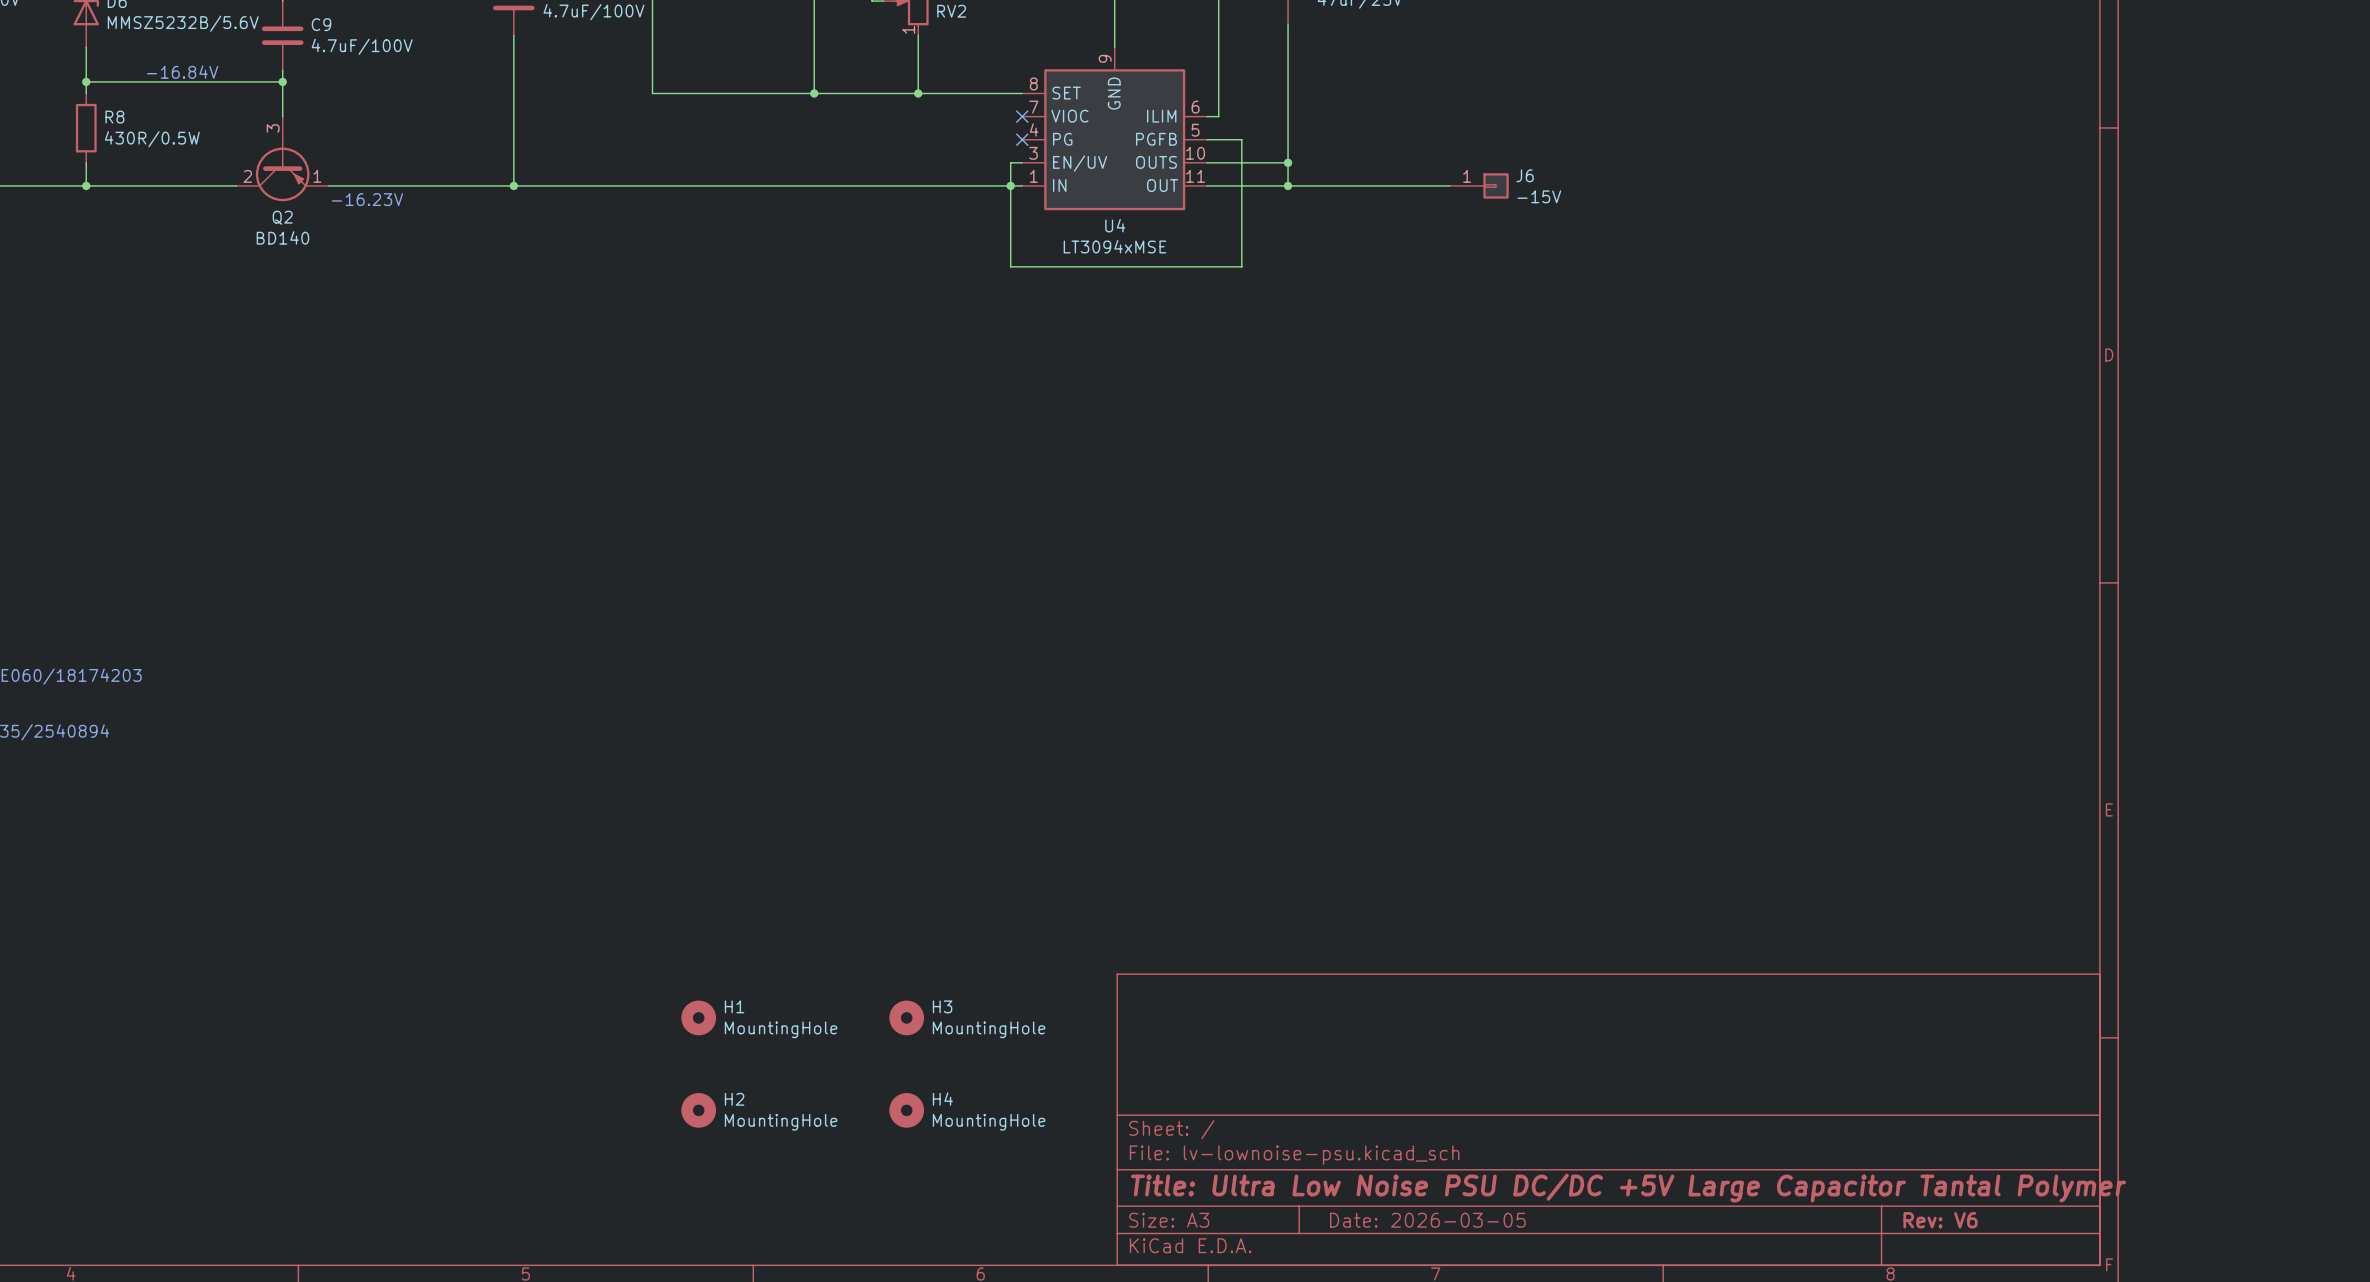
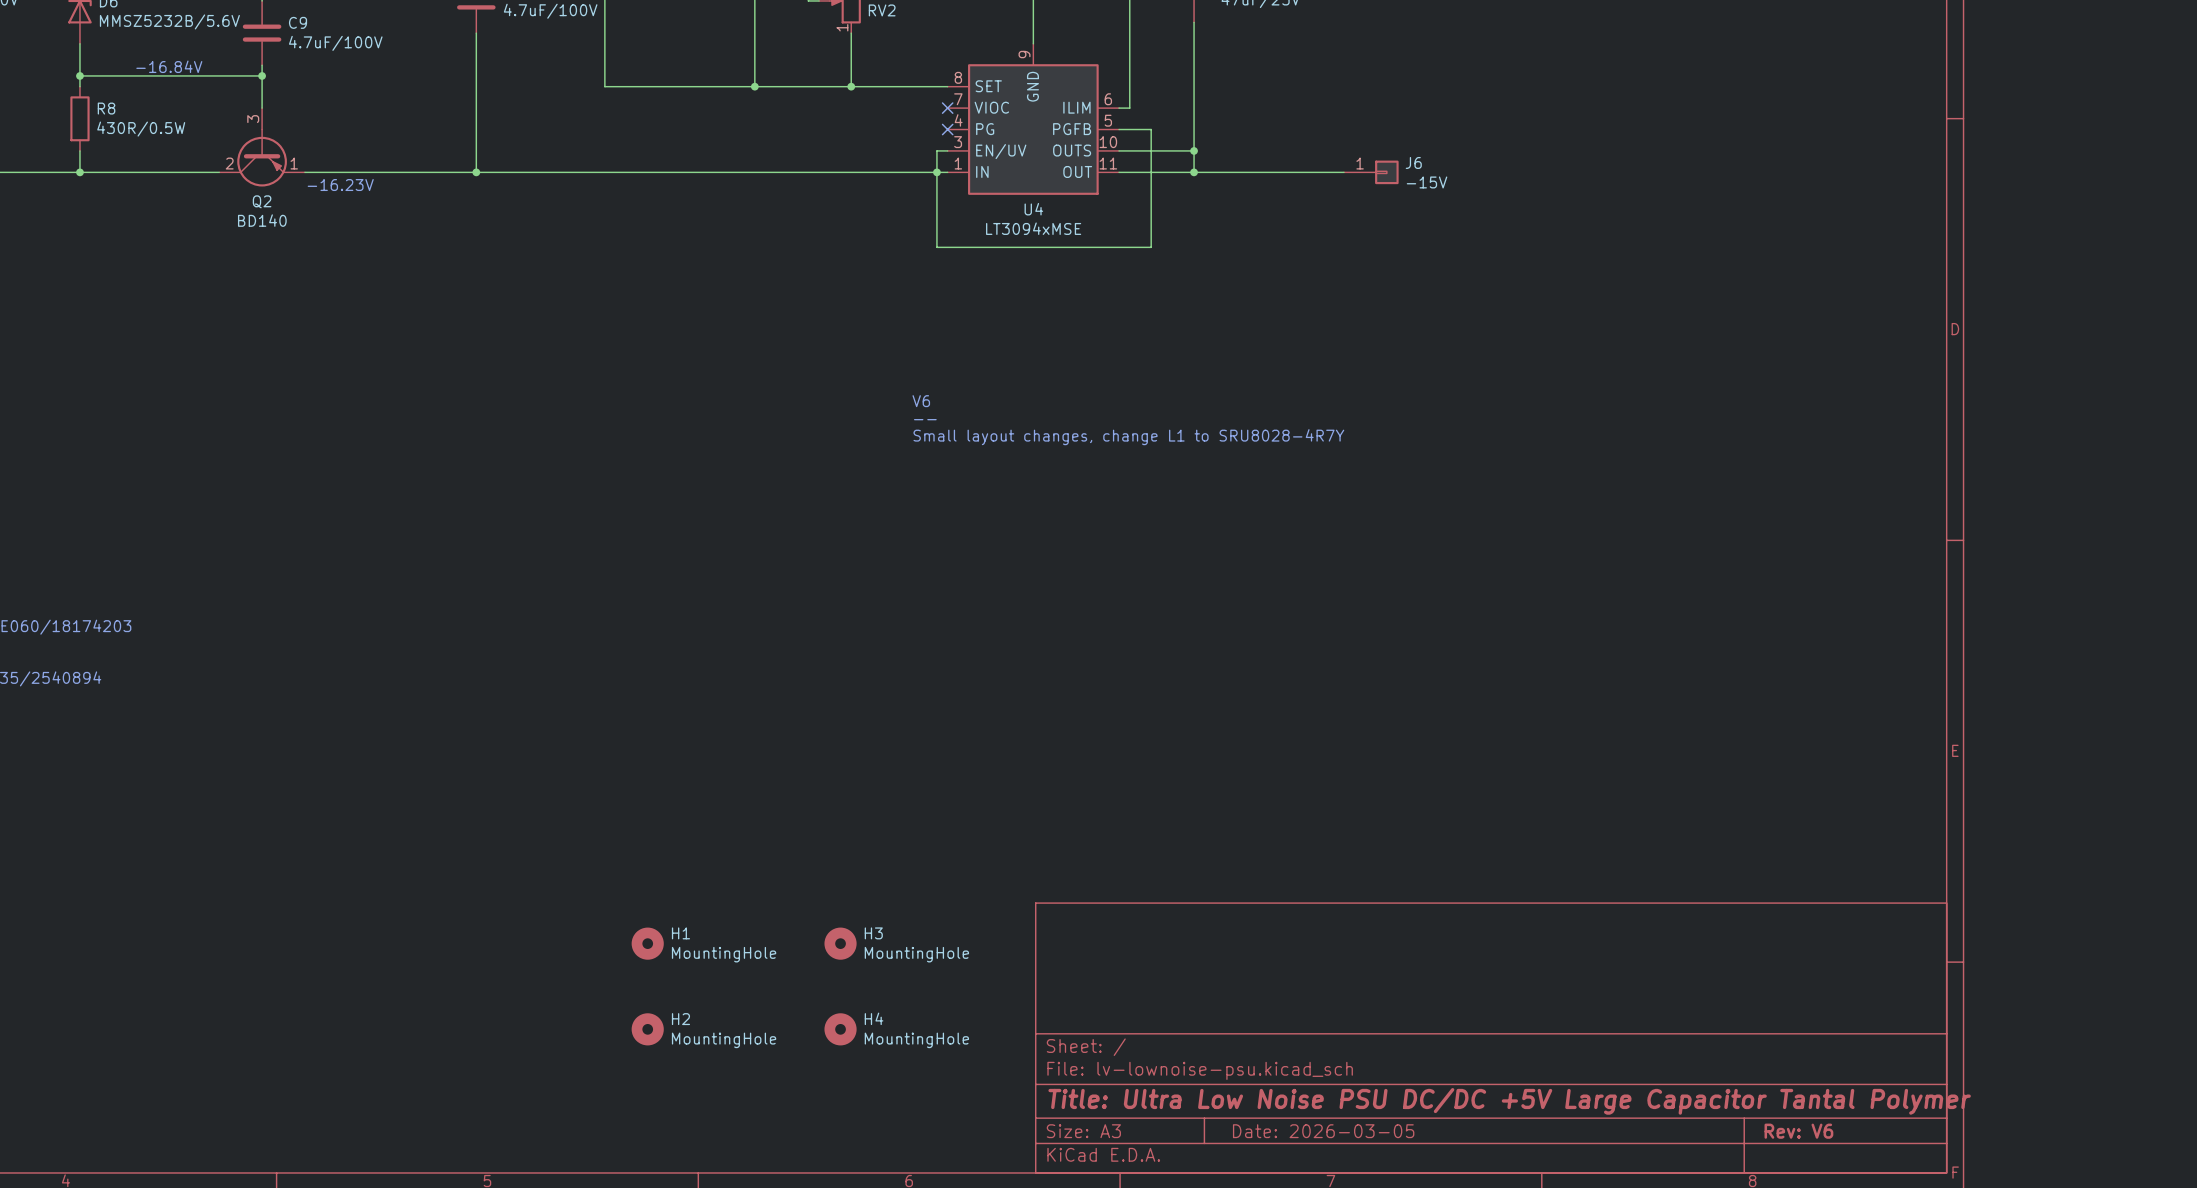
text: none -> V6 (921, 401)
text: none -> -- (925, 419)
text: none -> Small layout changes, change L1 to SRU8028-4R7Y (1128, 437)

